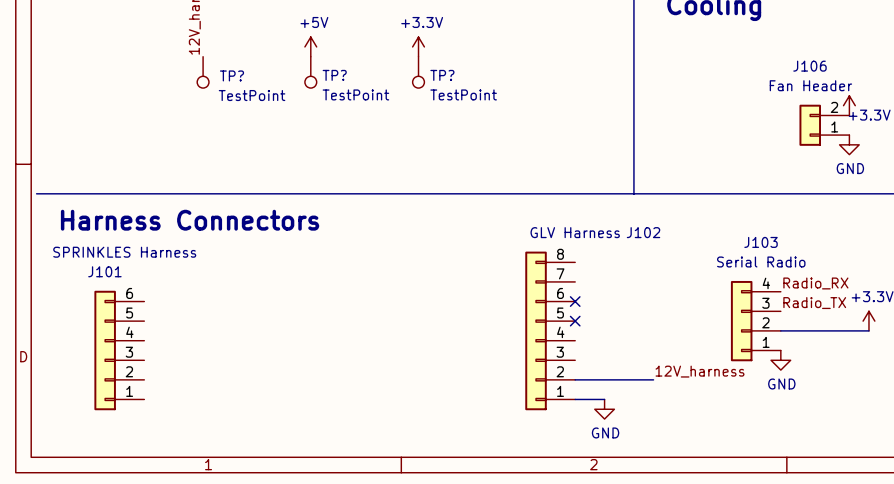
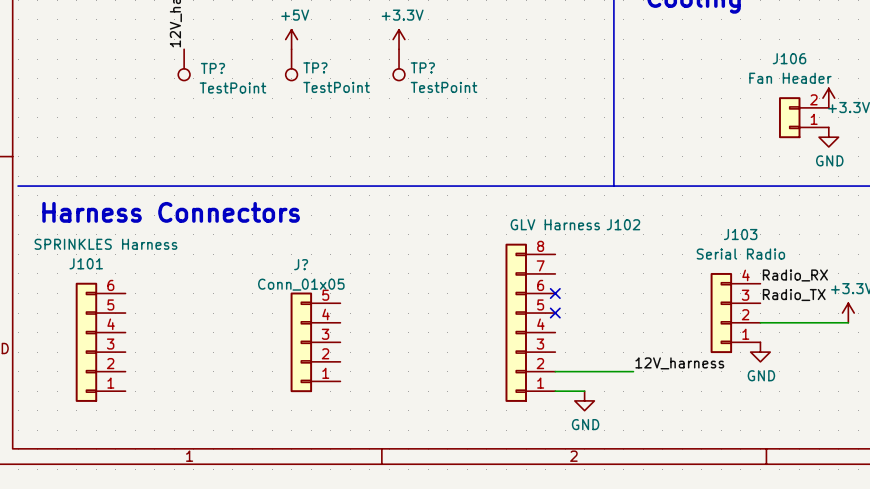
J?: none -> Conn_01x05 (315, 342)

